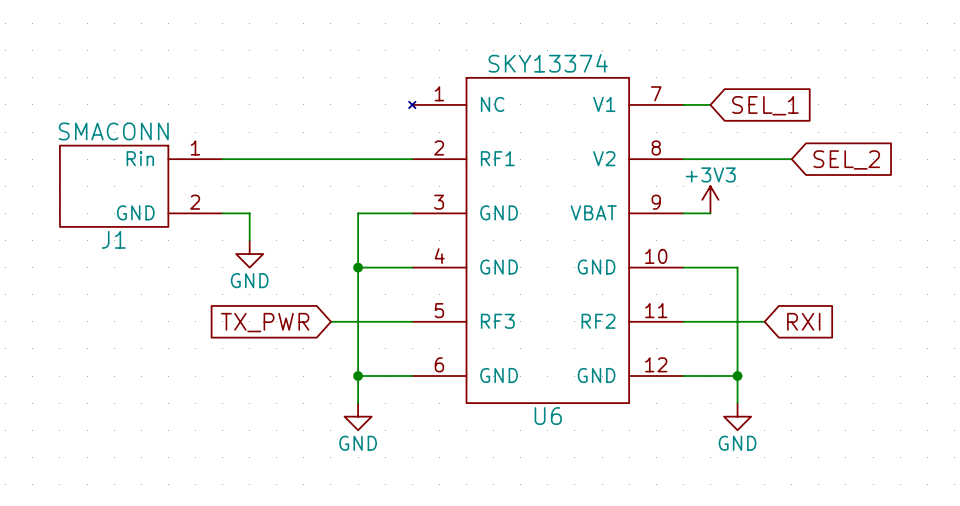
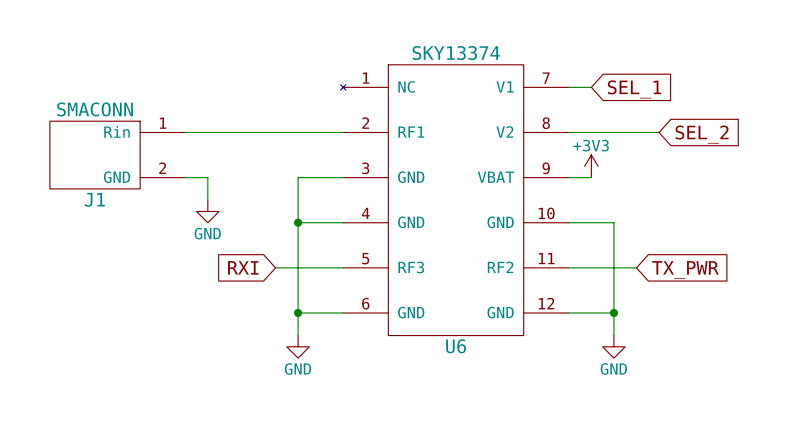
global label: RXI (803, 321) -> TX_PWR (685, 270)
global label: TX_PWR (265, 322) -> RXI (243, 267)

